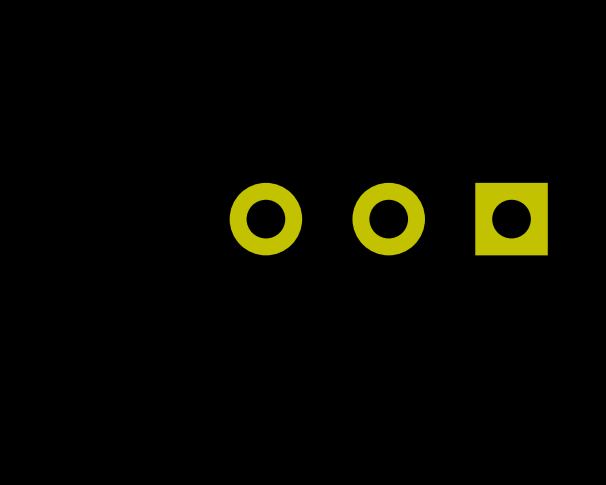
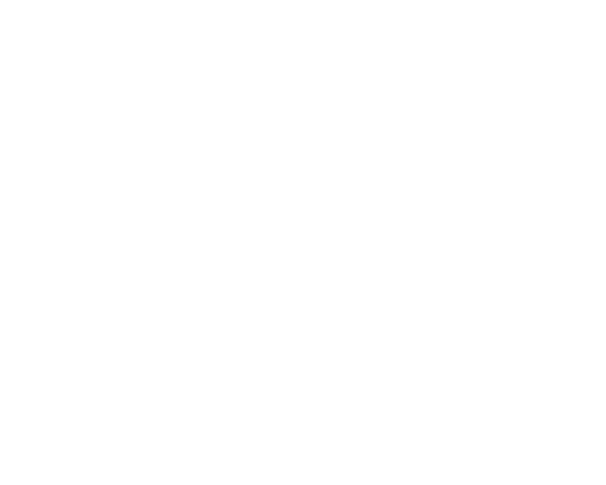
part: (388, 219) -> none

